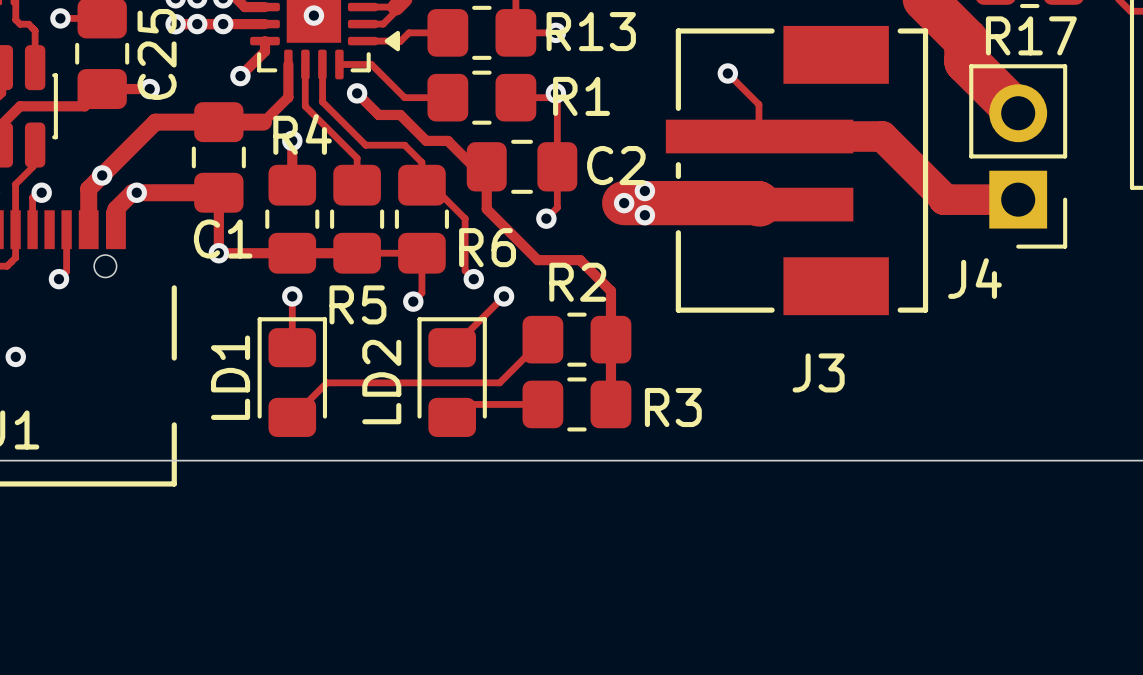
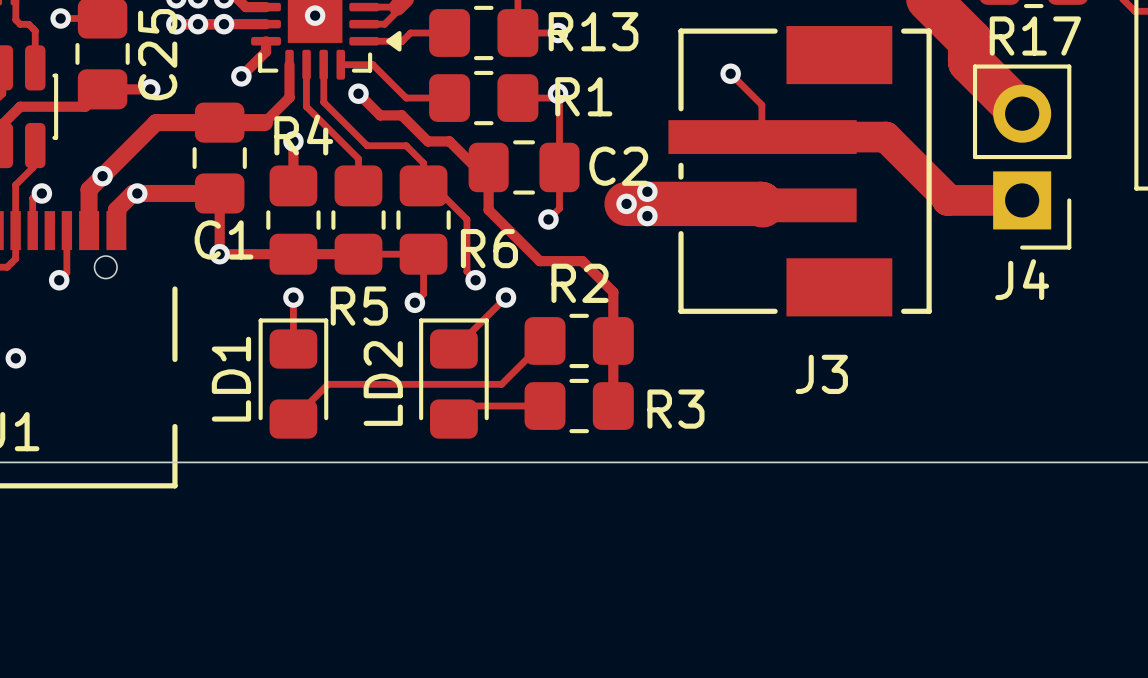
J4 name position: J4 (975, 278) -> J4 (1022, 279)

